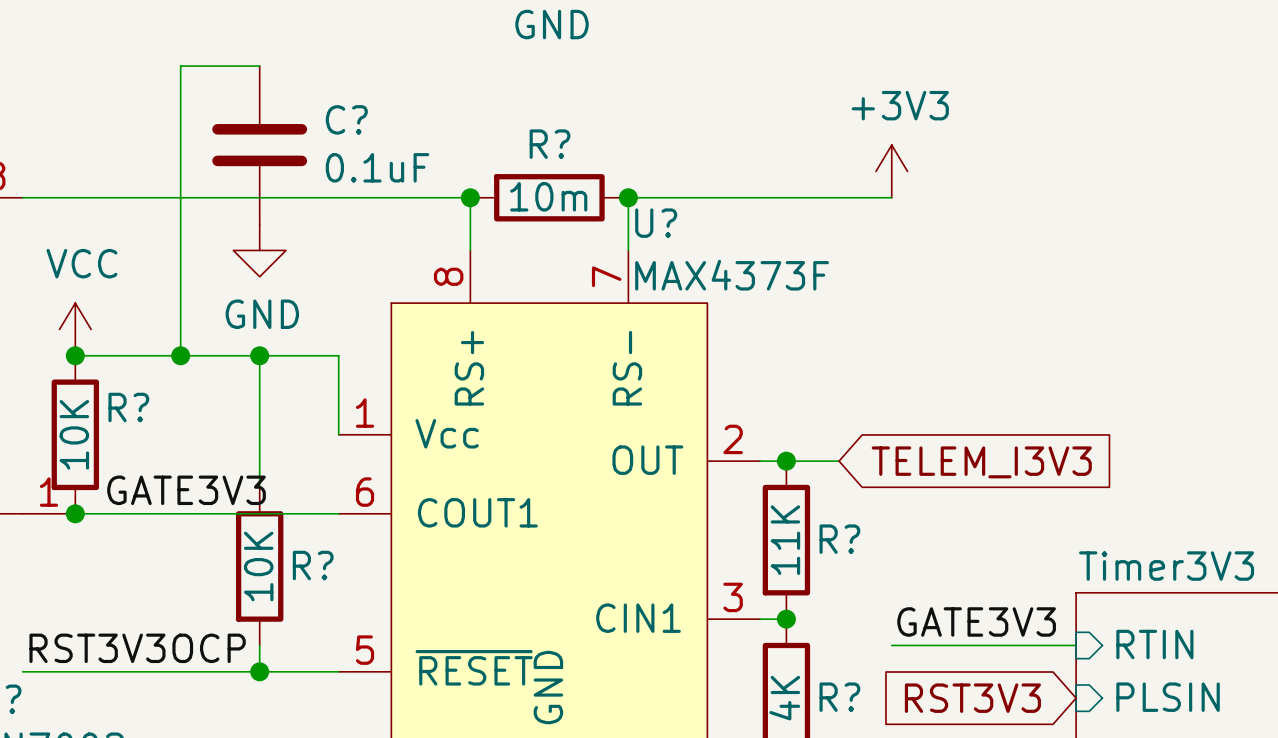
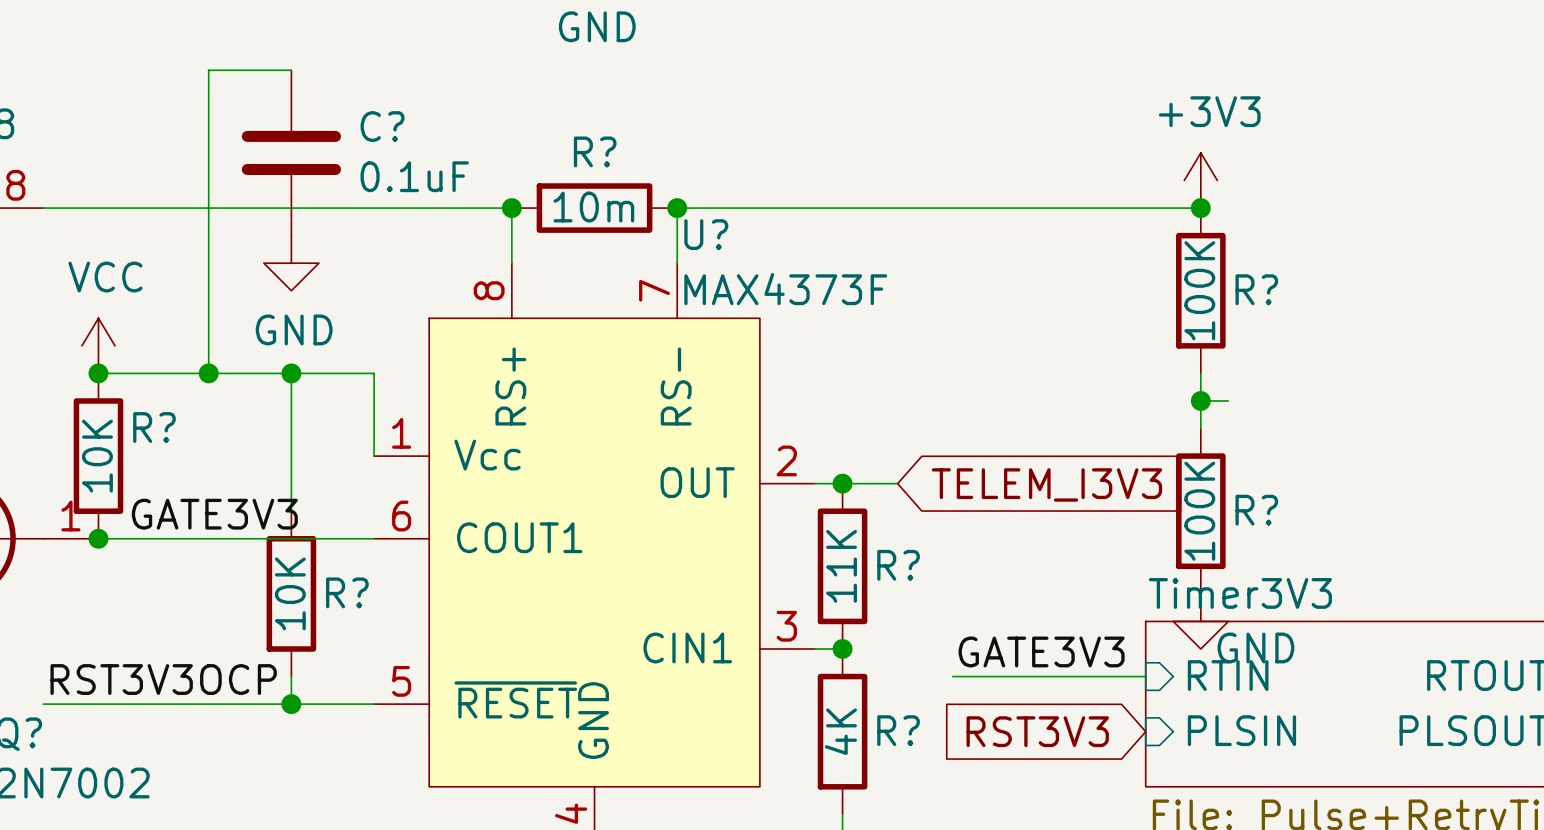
power symbol position: +3V3 (891, 171) -> +3V3 (1200, 180)
wire: none -> (952, 208) (1200, 208)
junction: none -> (1200, 208)
R?: none -> 100K (1200, 290)
wire: none -> (1200, 373) (1200, 428)
wire: none -> (1200, 400) (1228, 400)
junction: none -> (1200, 400)
R?: none -> 100K (1200, 511)
power symbol: none -> GND (1200, 621)

